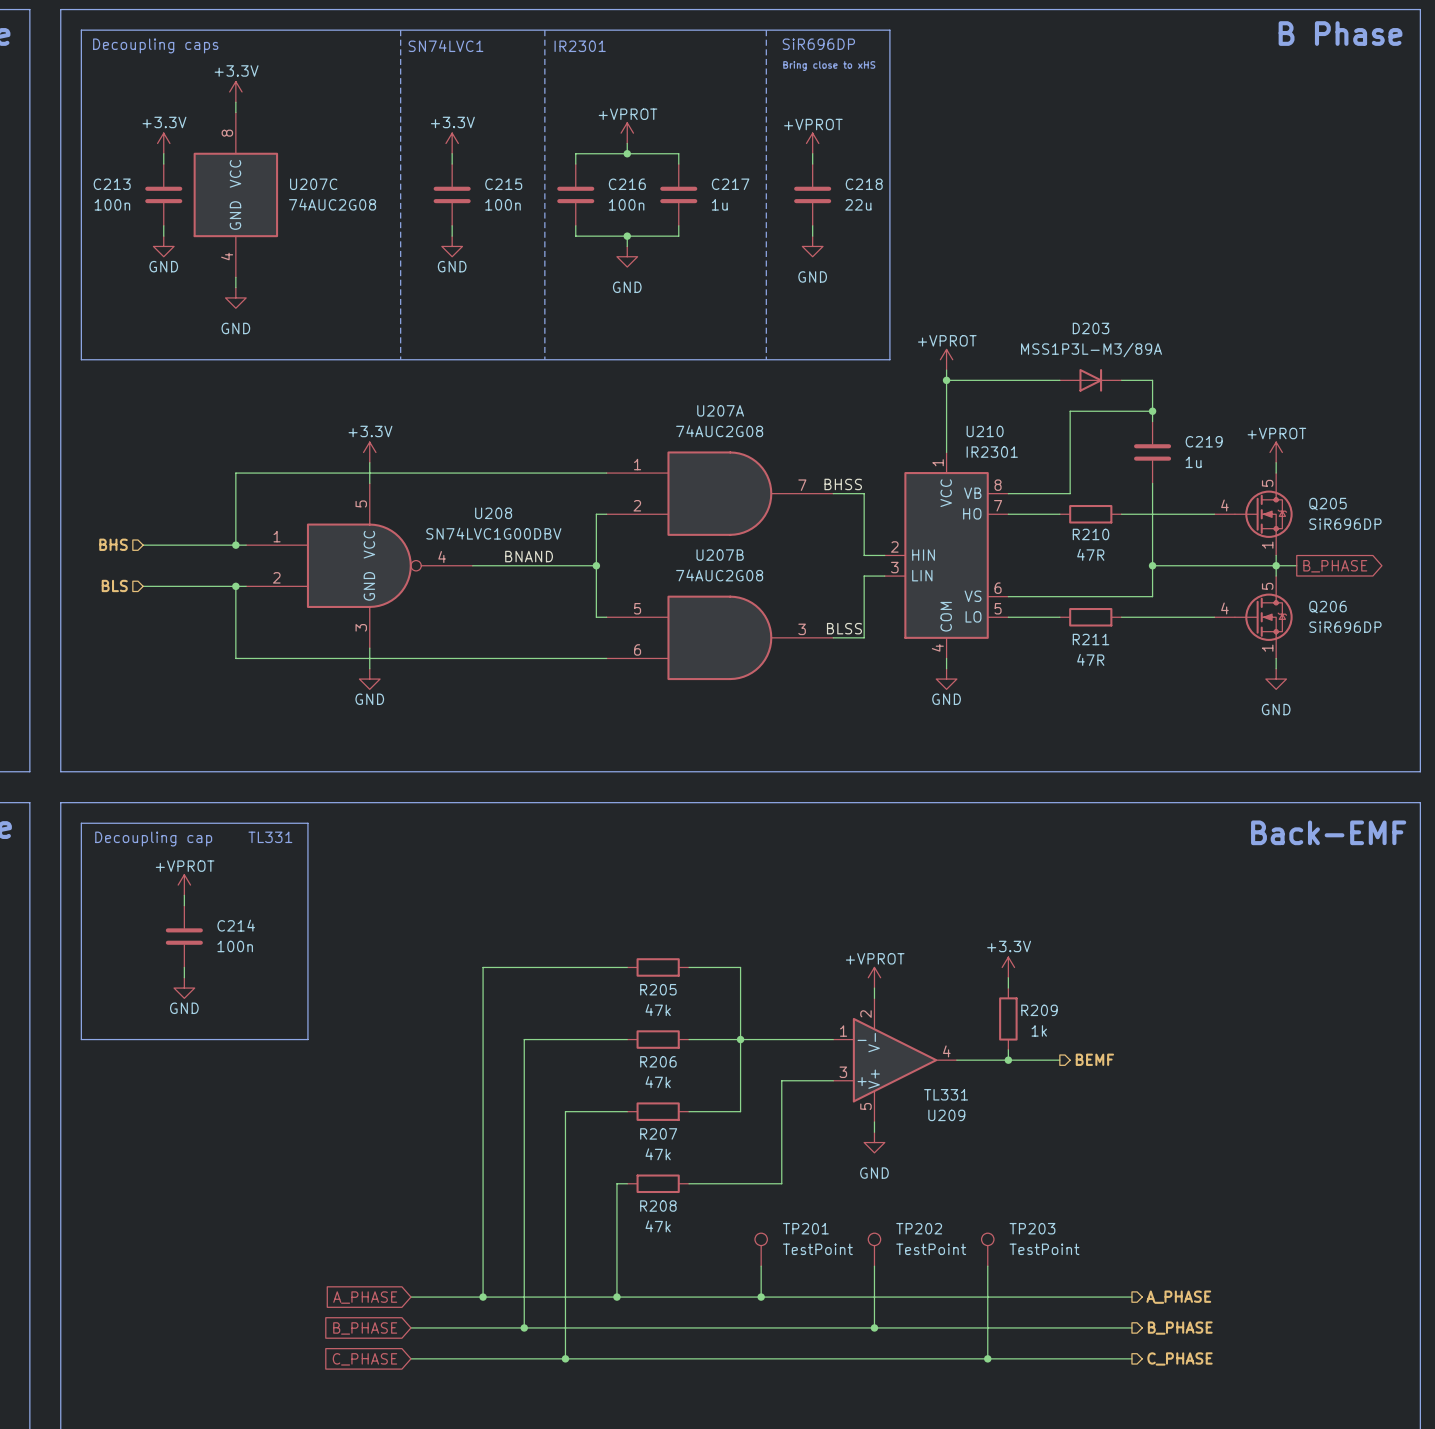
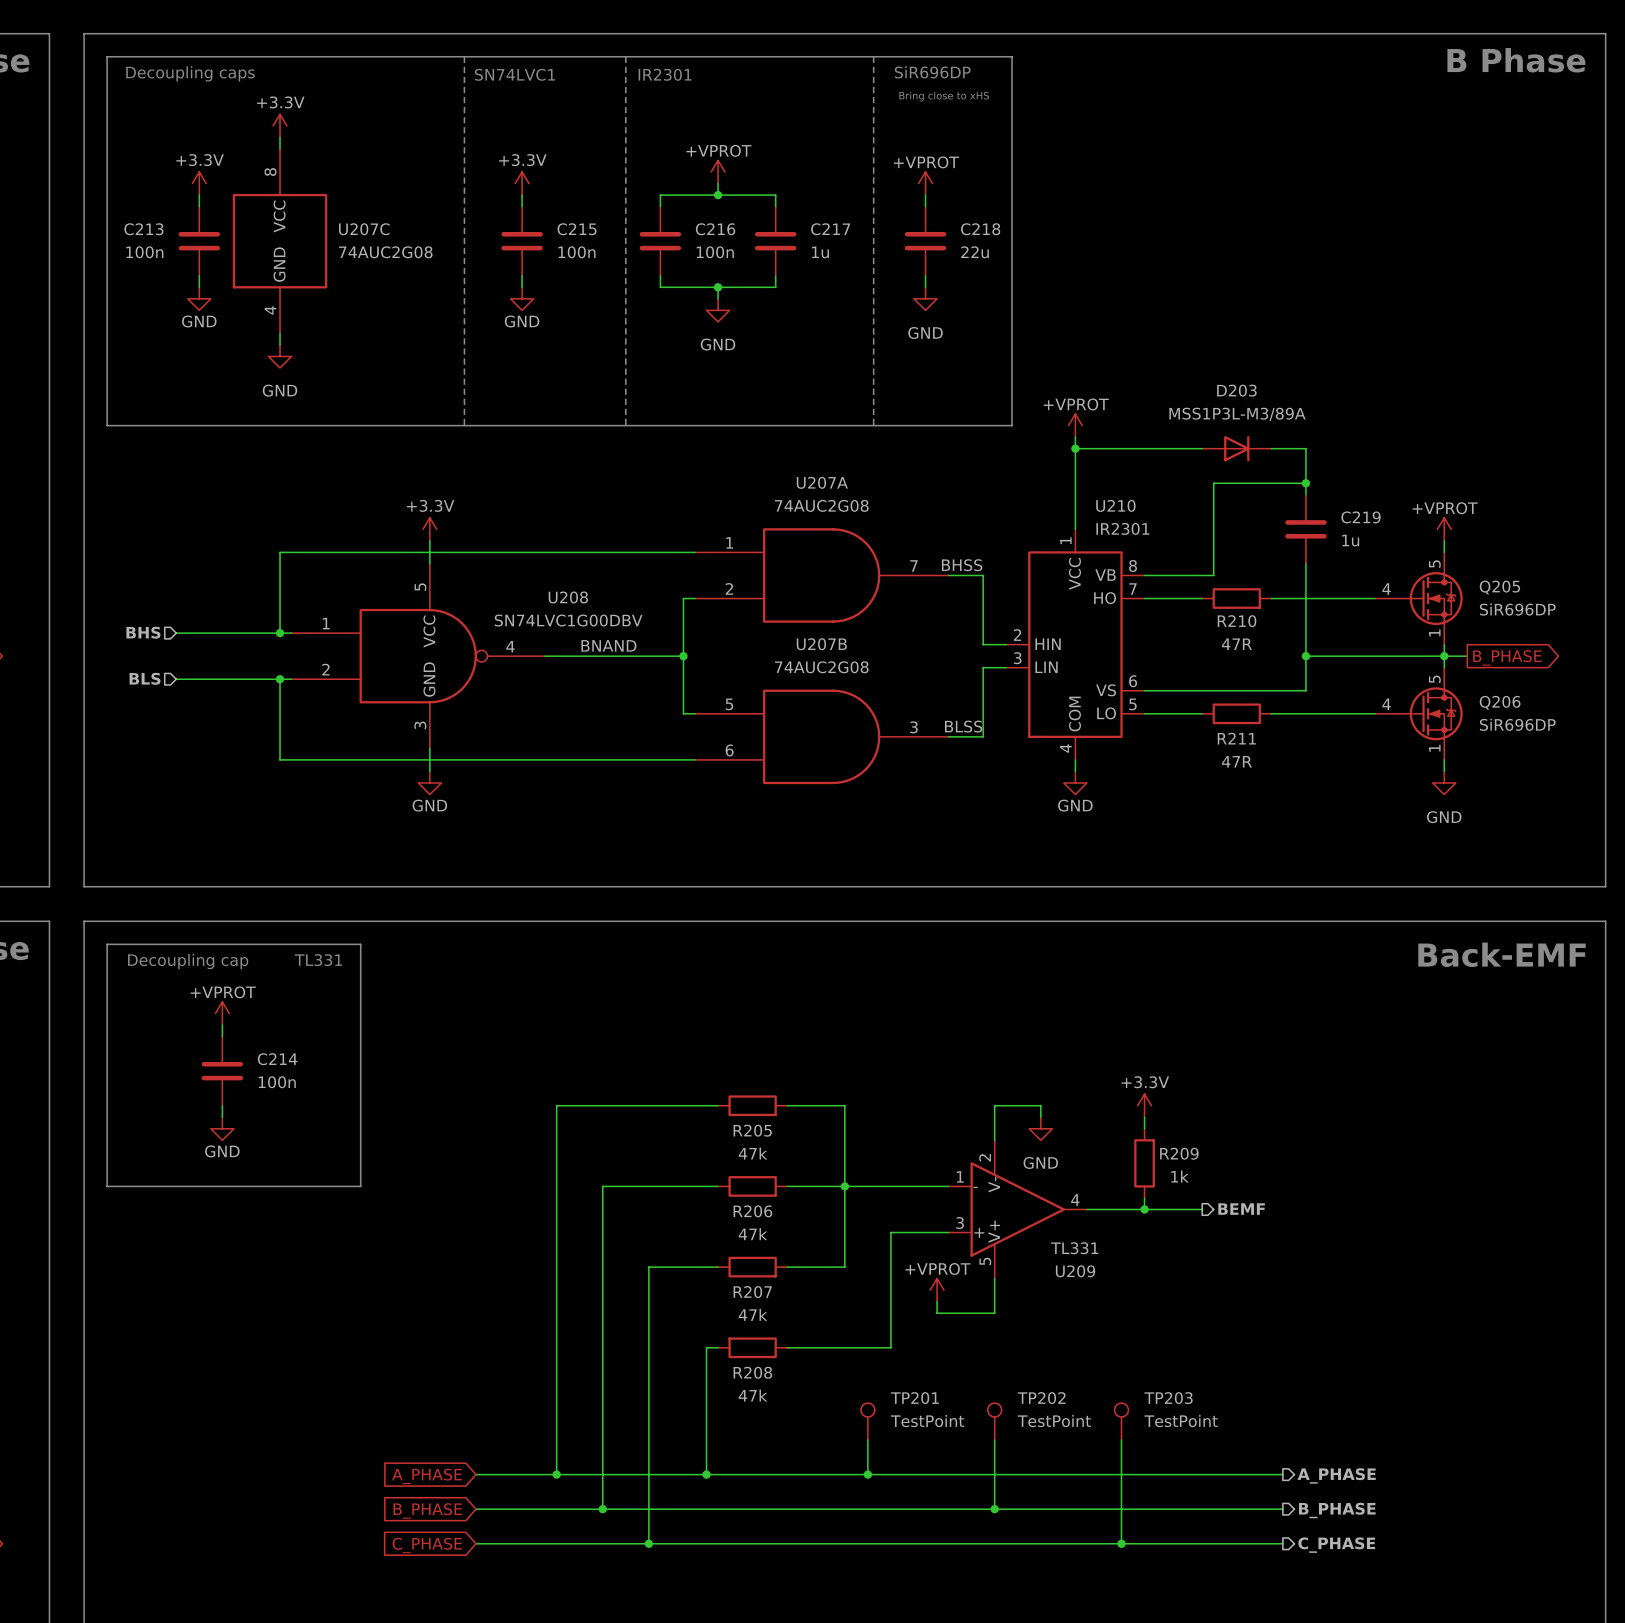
power symbol position: +VPROT (874, 977) -> +VPROT (937, 1290)
wire: none -> (1040, 1117) (1040, 1105) (994, 1105) (994, 1128)
wire: none -> (994, 1290) (994, 1313) (937, 1313) (937, 1301)
power symbol position: GND (874, 1142) -> GND (1040, 1128)

